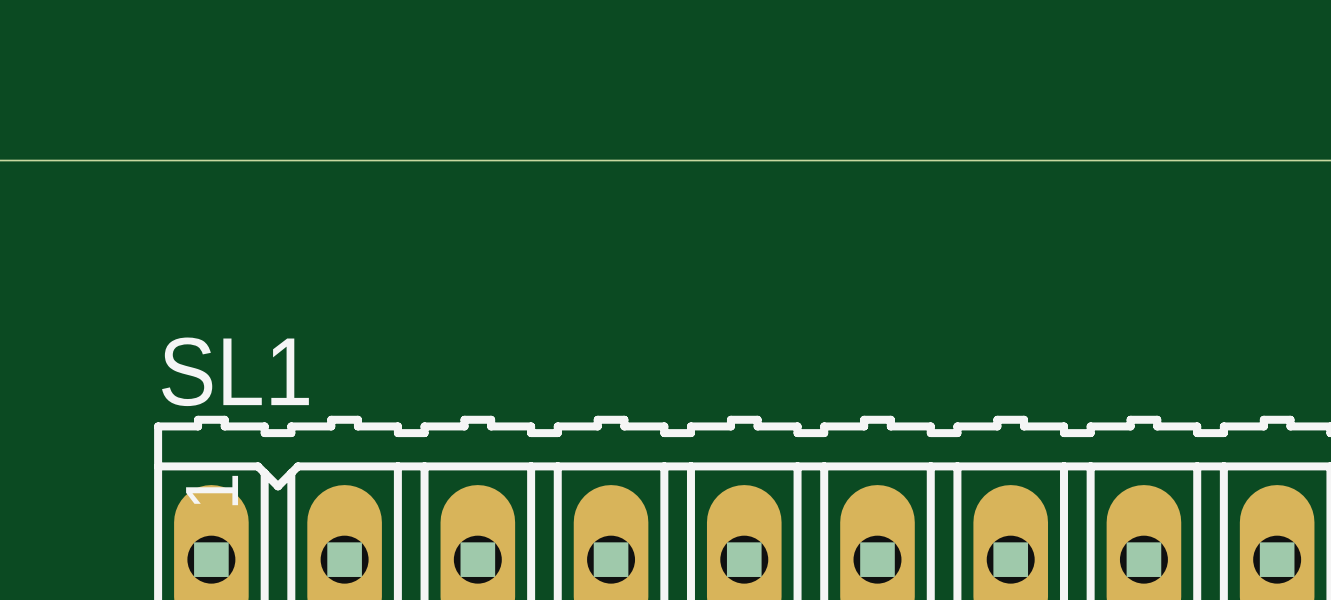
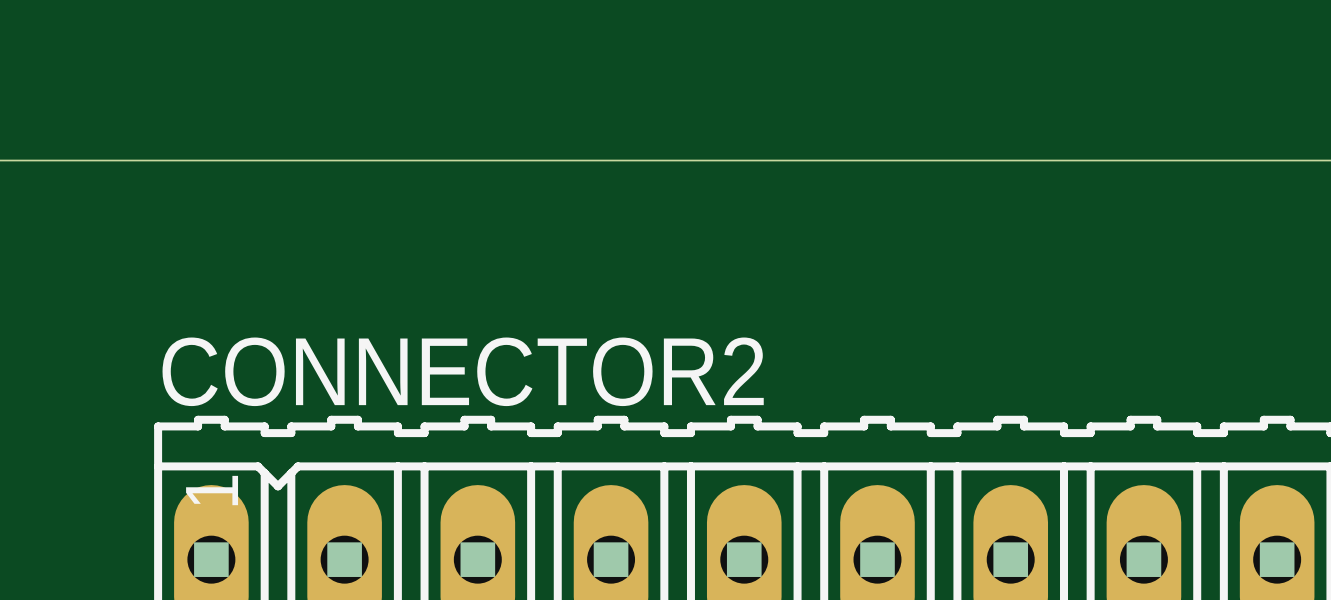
SL1 name: SL1 (235, 371) -> CONNECTOR2 (463, 371)

